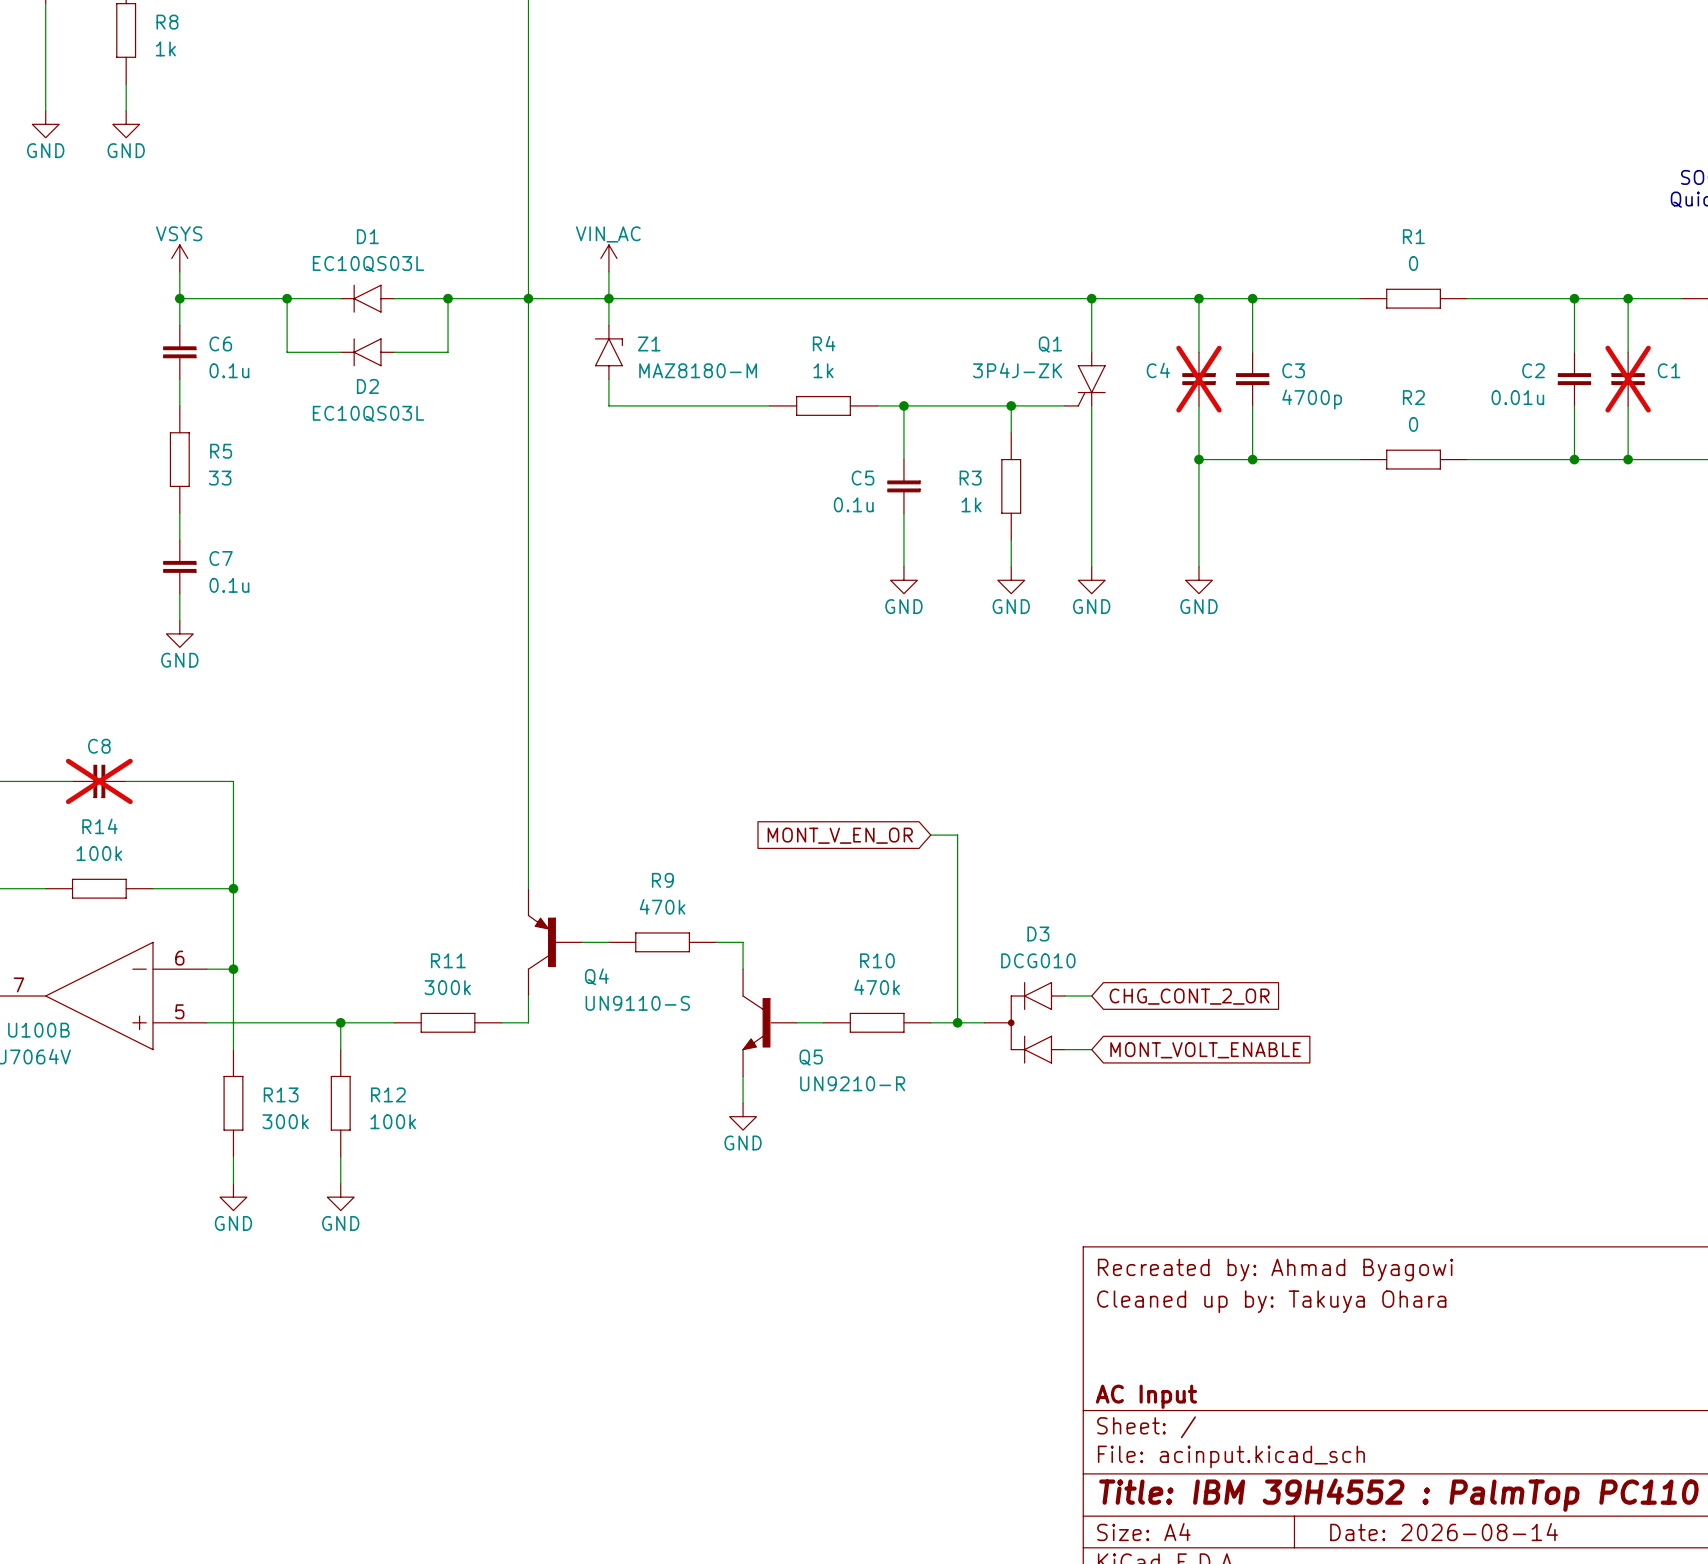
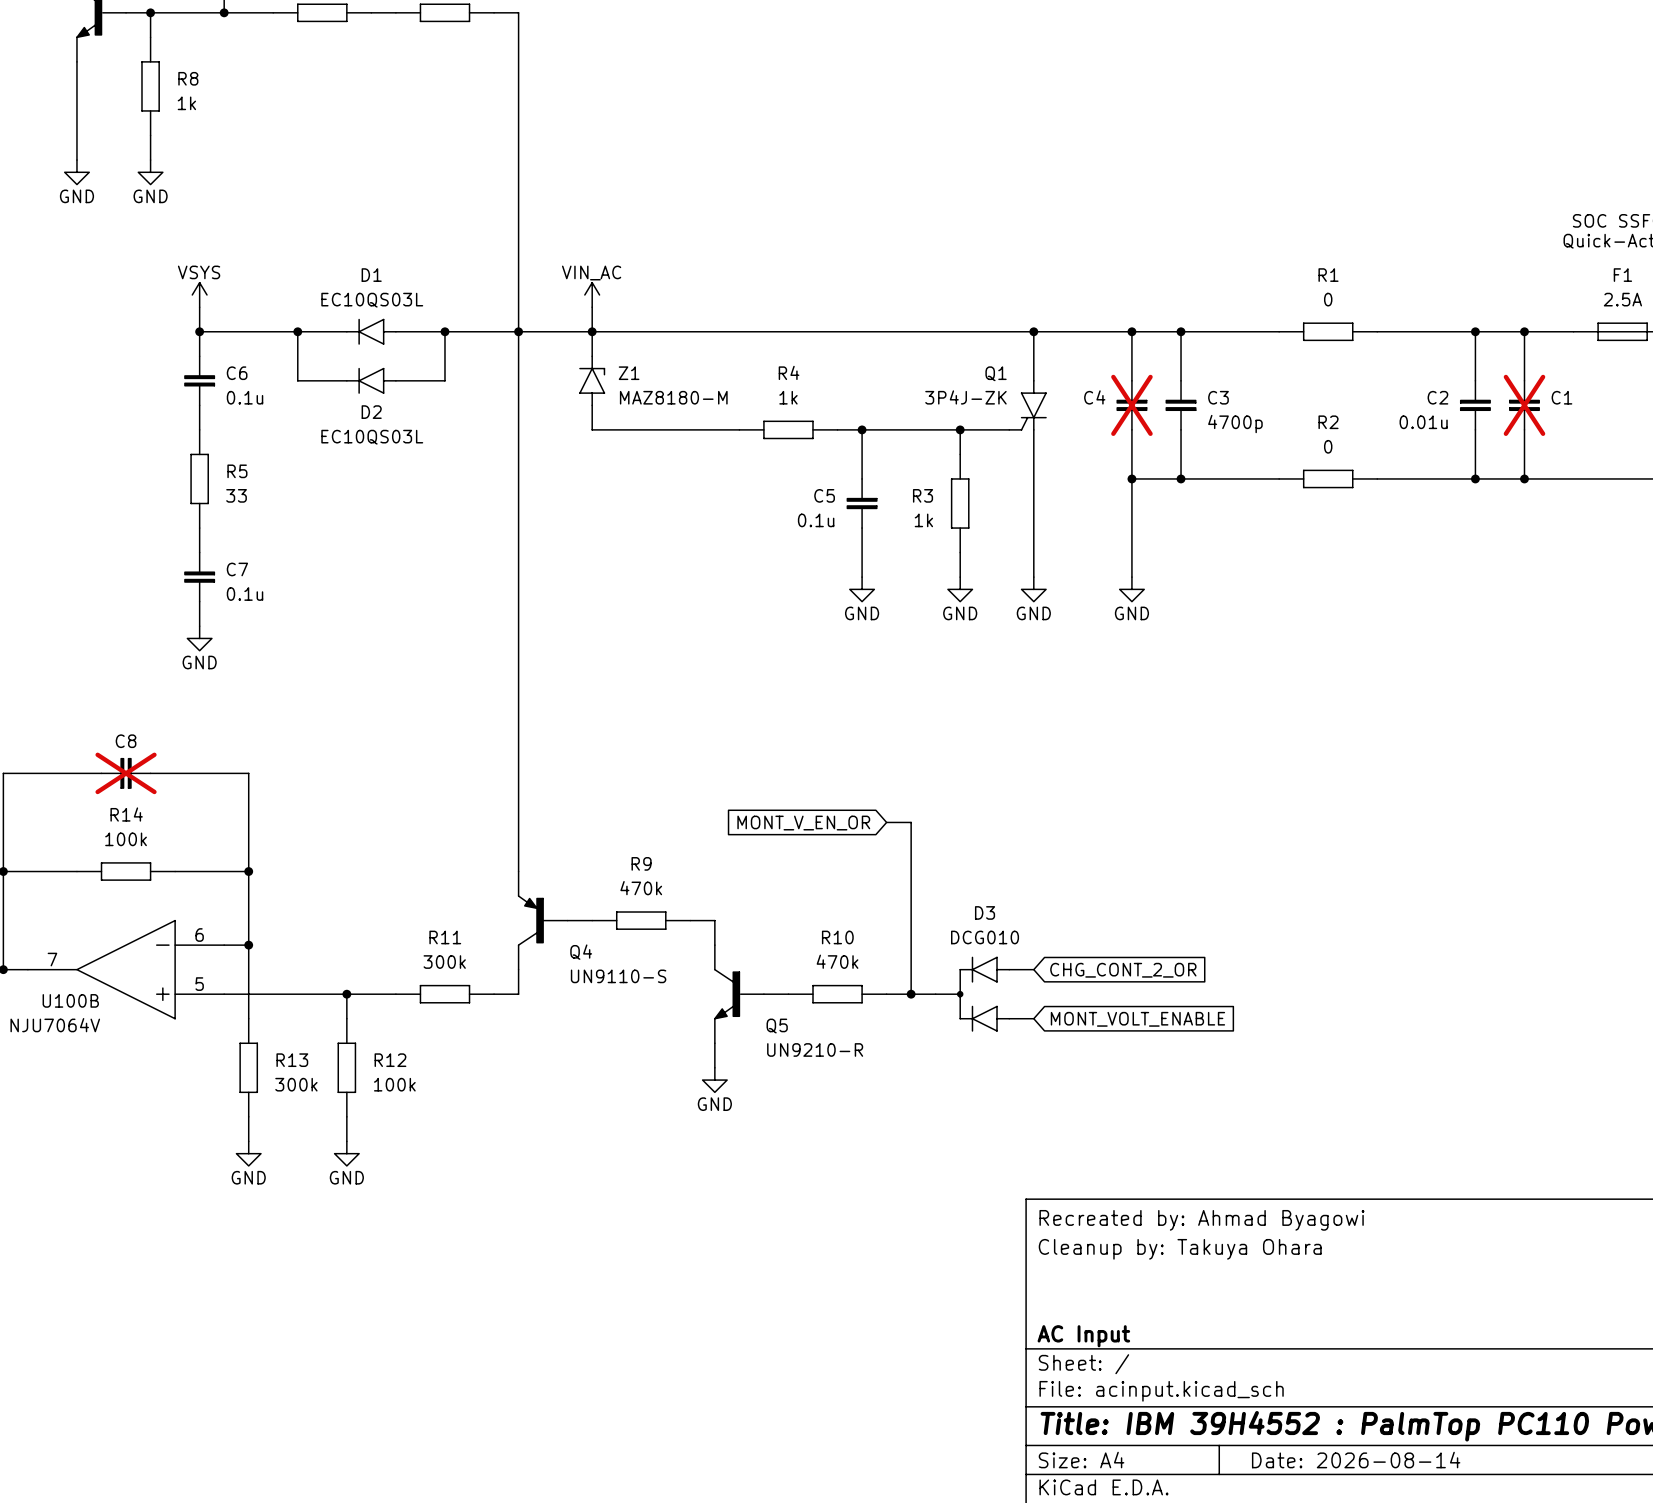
title block: Cleaned up by: Takuya Ohara (1271, 1301) -> Cleanup by: Takuya Ohara (1180, 1249)

